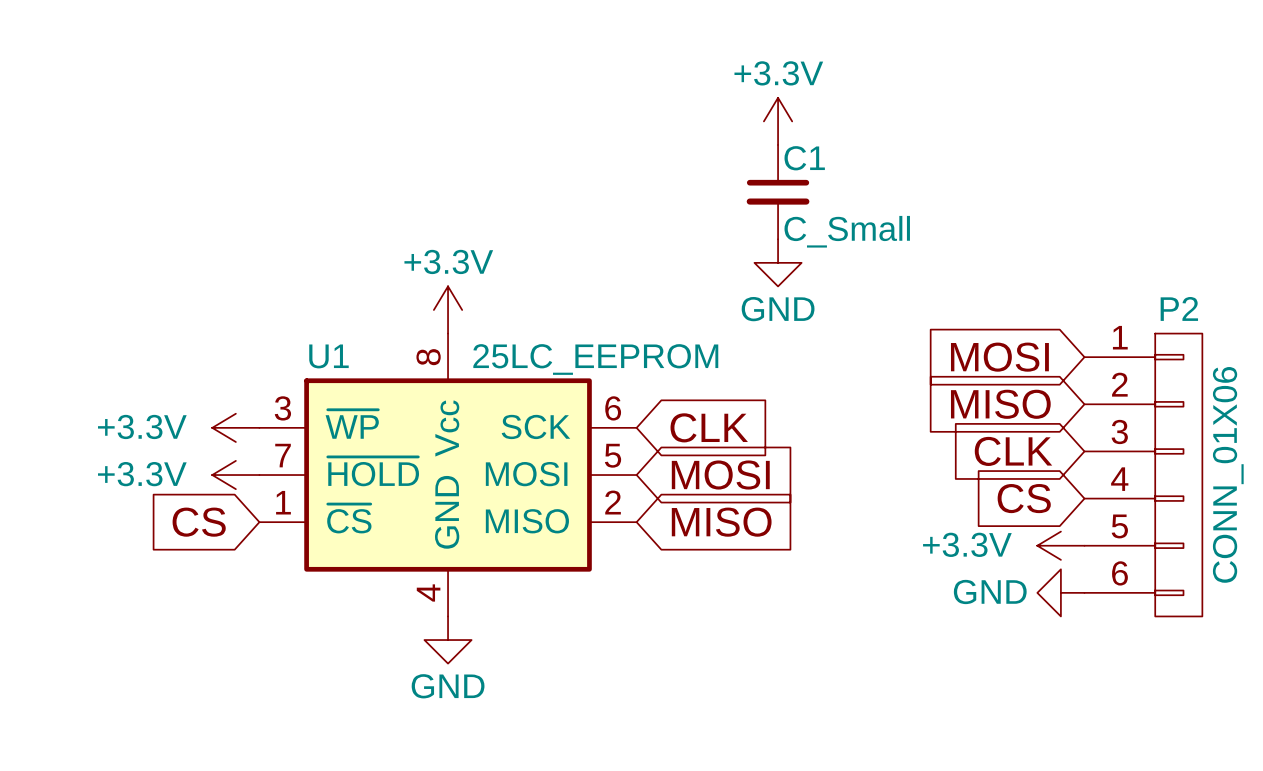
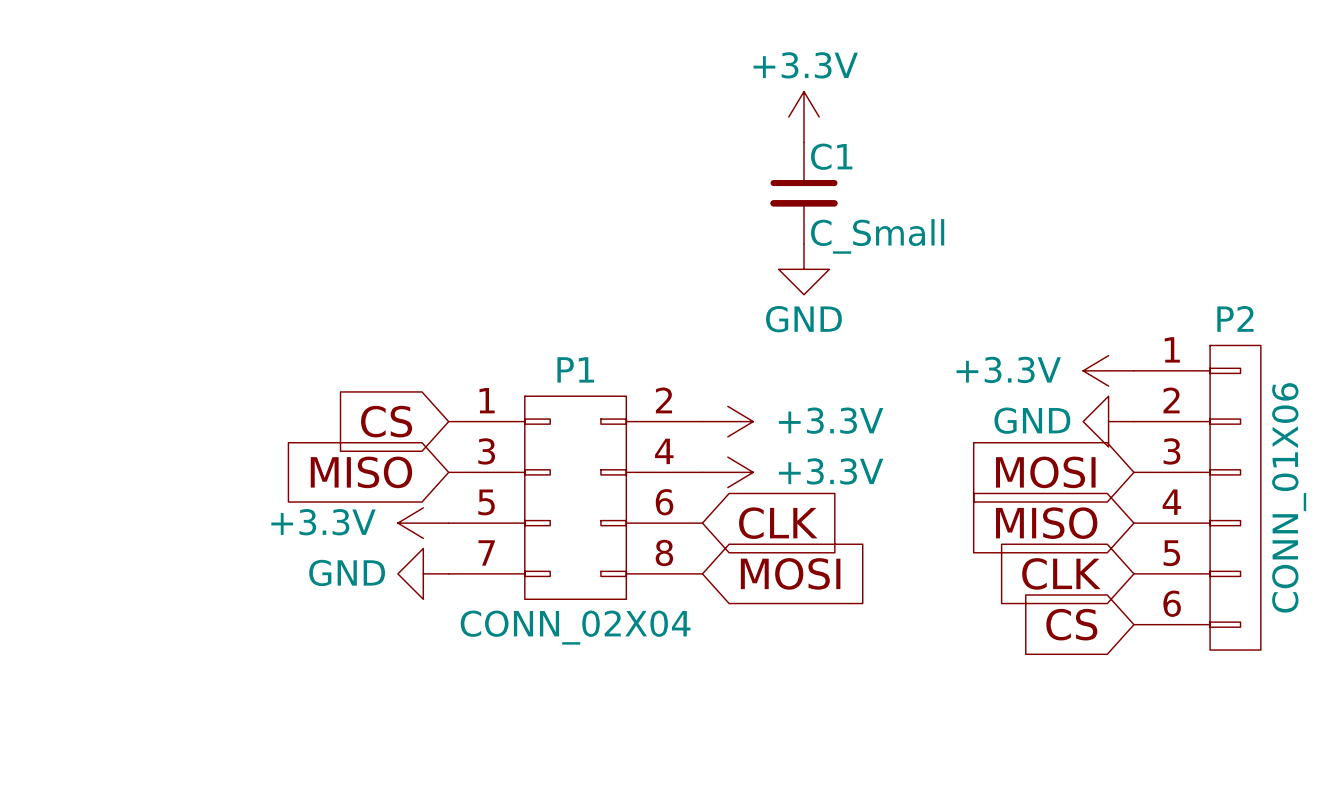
power symbol: +3.3V (448, 310) -> none
global label: MOSI (999, 357) -> none
power symbol: none -> +3.3V (1108, 370)
power symbol: none -> +3.3V (727, 421)
global label: MISO (1000, 404) -> none
power symbol: +3.3V (235, 427) -> none
global label position: CLK (709, 427) -> CLK (778, 523)
power symbol: none -> +3.3V (727, 472)
global label: CLK (1013, 451) -> MOSI (1045, 472)
power symbol: +3.3V (235, 475) -> none
U1: 25LC_EEPROM (448, 475) -> none
P1: none -> CONN_02X04 (575, 497)
global label position: MOSI (720, 475) -> MOSI (790, 573)
power symbol: none -> +3.3V (423, 523)
global label: CS (1024, 498) -> MISO (1046, 523)
global label position: CS (199, 522) -> CS (386, 421)
global label rotation: 0° (721, 522) -> 180° (361, 472)
global label position: MISO (721, 522) -> MISO (361, 472)
global label: none -> CLK (1061, 573)
power symbol: +3.3V (1060, 545) -> none
global label: none -> CS (1071, 624)
power symbol position: GND (1060, 592) -> GND (1108, 421)
power symbol rotation: 0° (448, 640) -> 90° clockwise (423, 573)
power symbol position: GND (448, 640) -> GND (423, 573)

